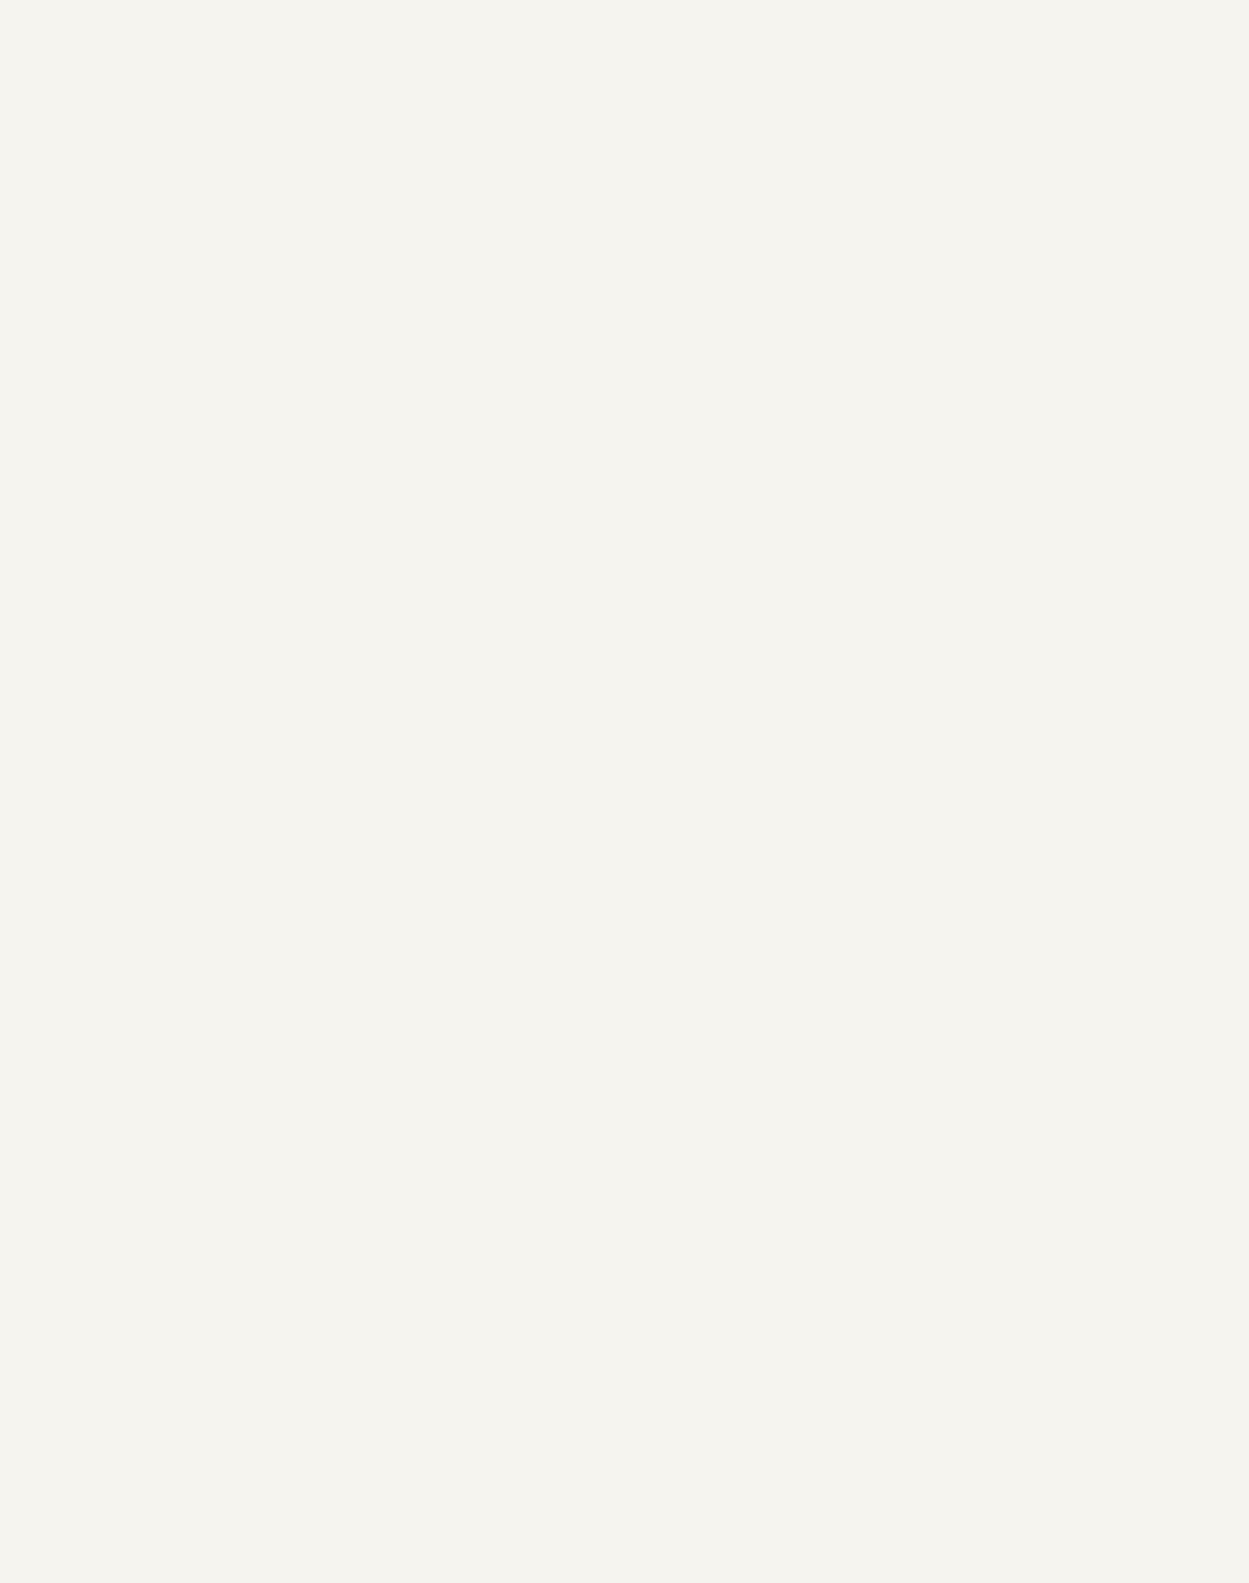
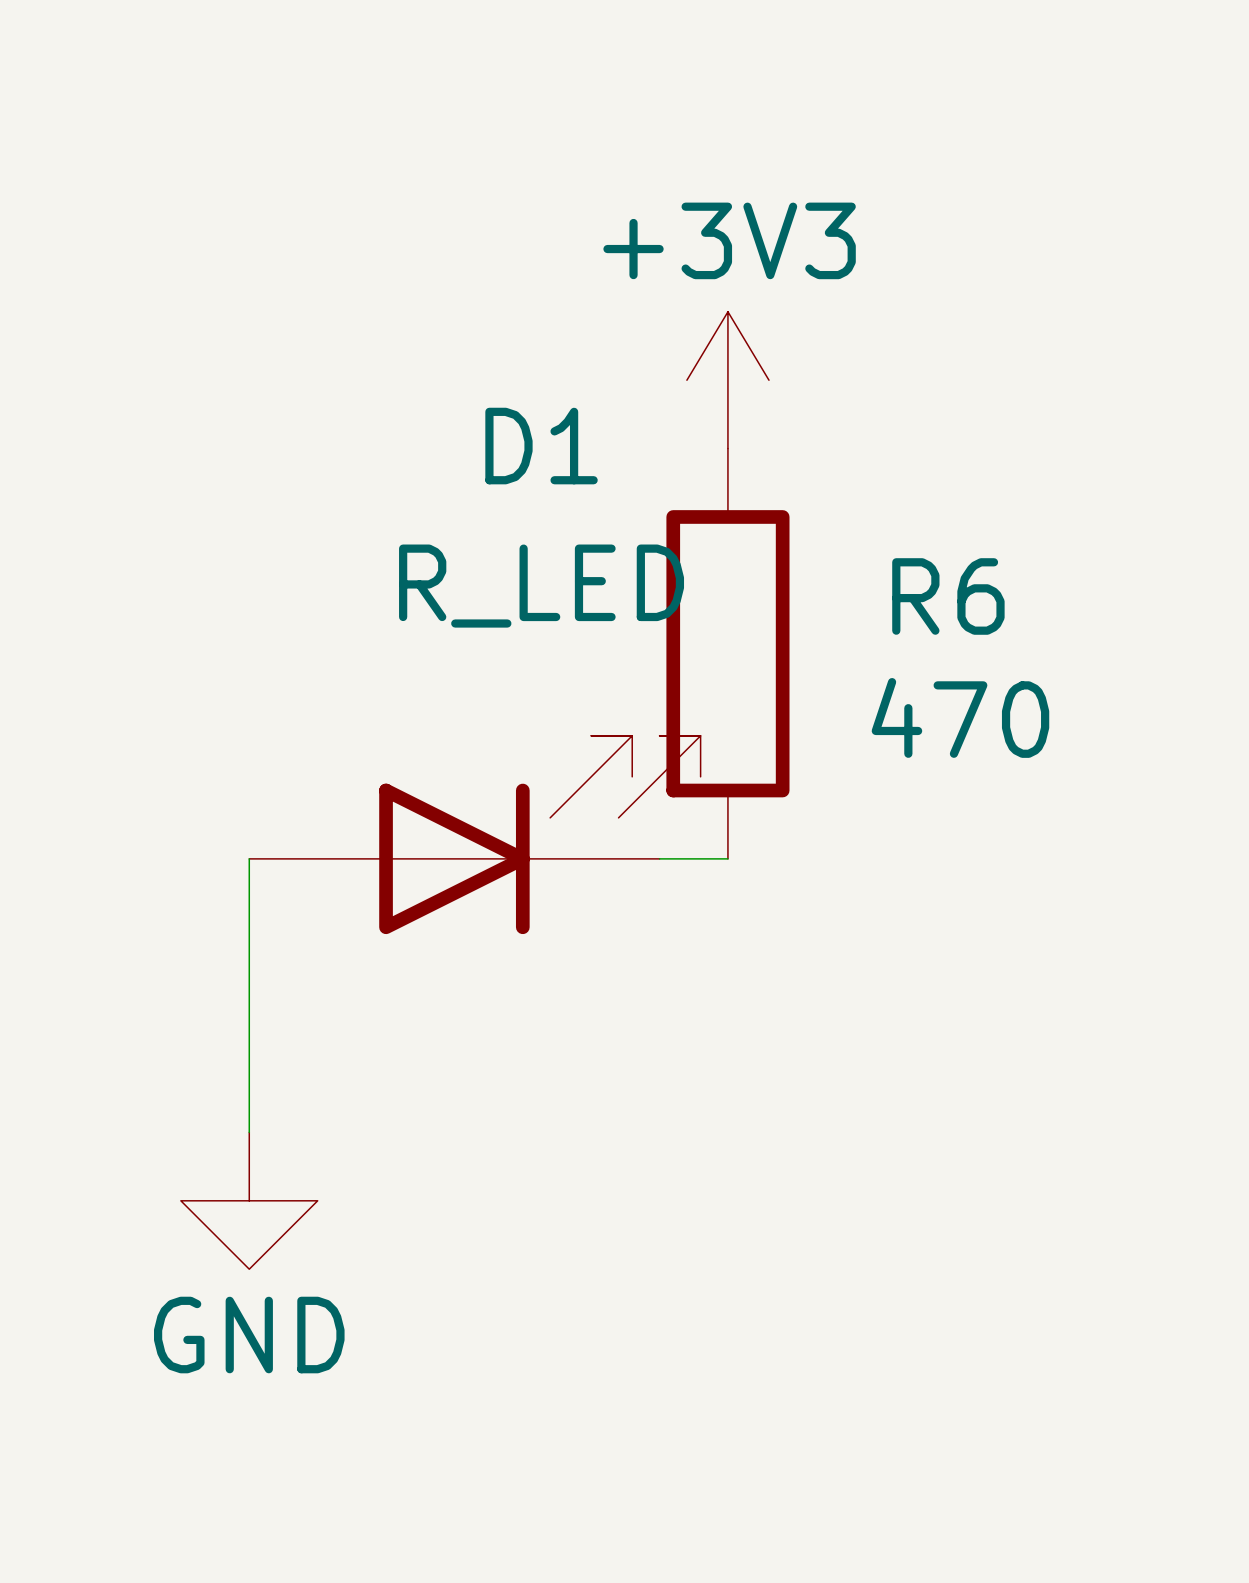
power symbol: none -> +3V3 (727, 380)
R6: none -> 470 (727, 653)
D1: none -> R_LED (474, 834)
wire: none -> (249, 858) (249, 1132)
wire: none -> (659, 858) (727, 858)
power symbol: none -> GND (249, 1200)

